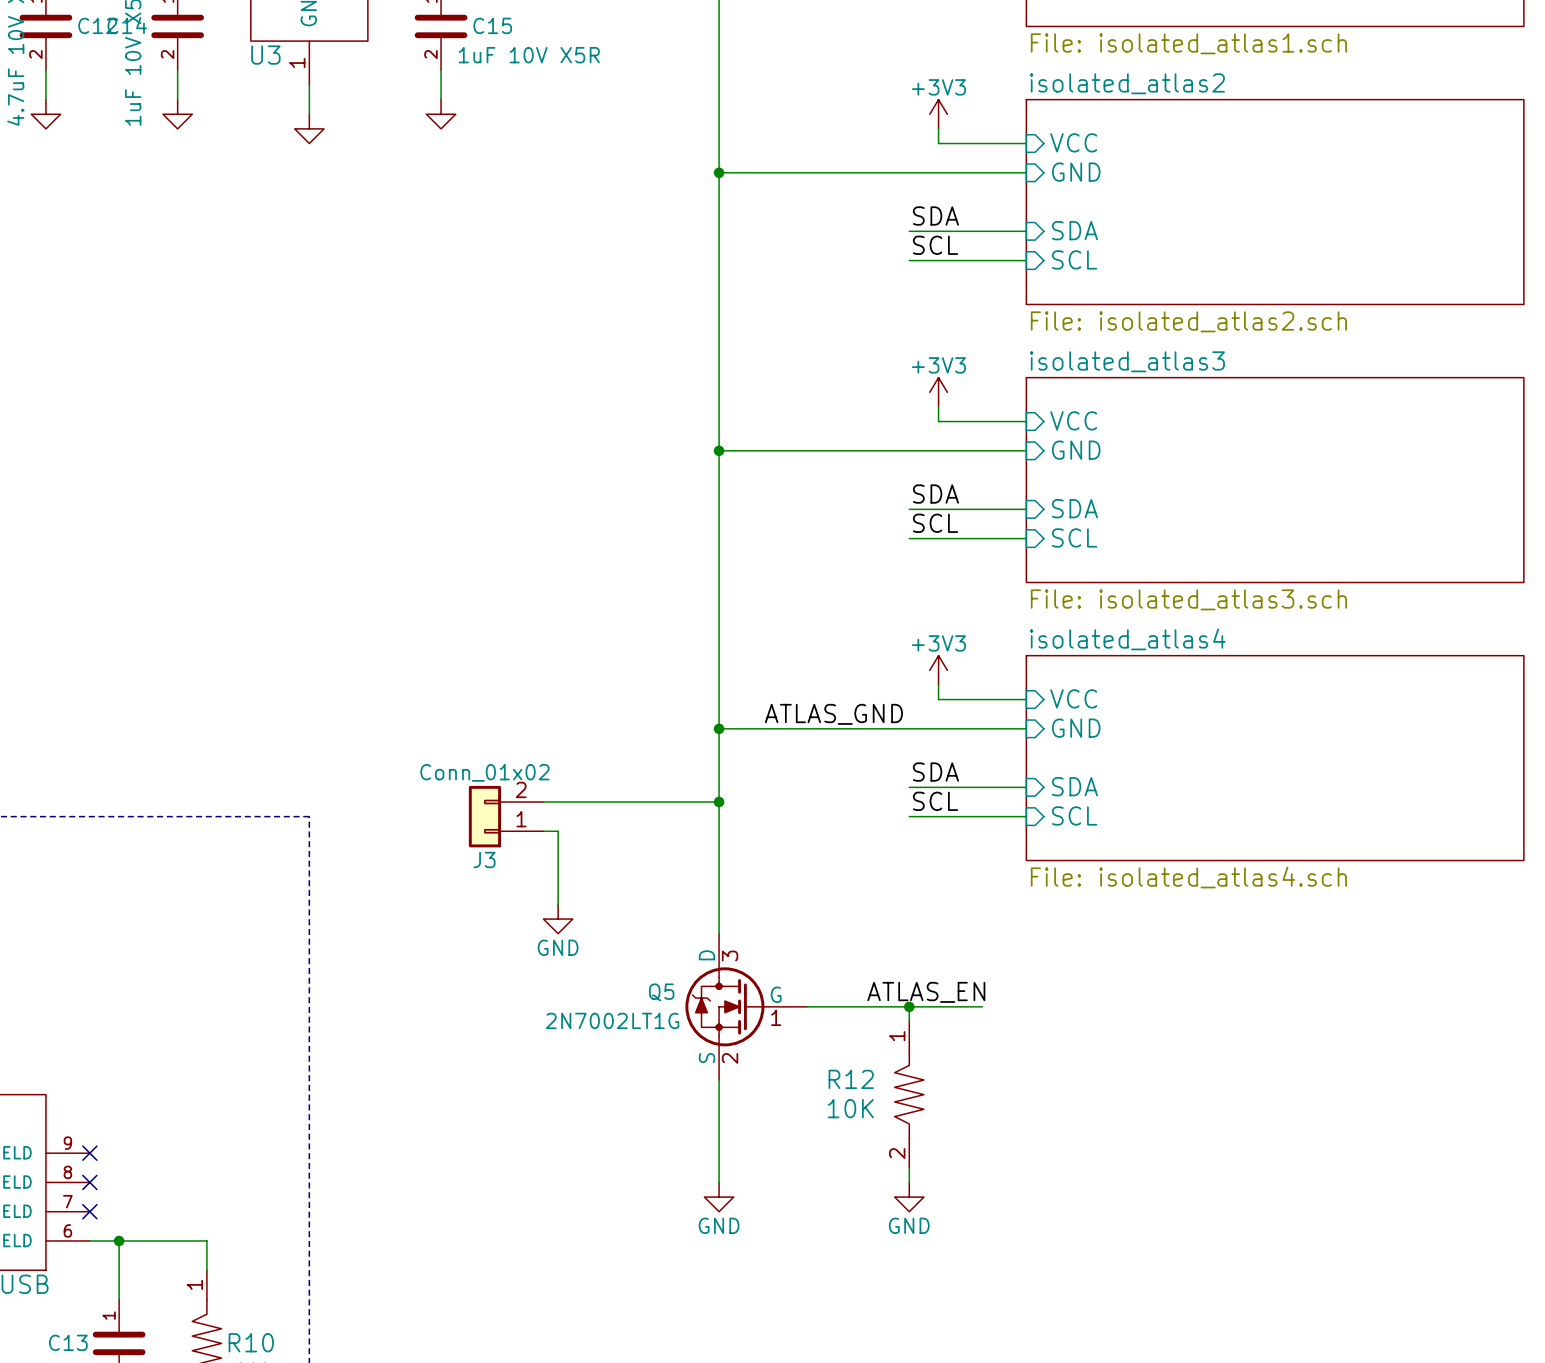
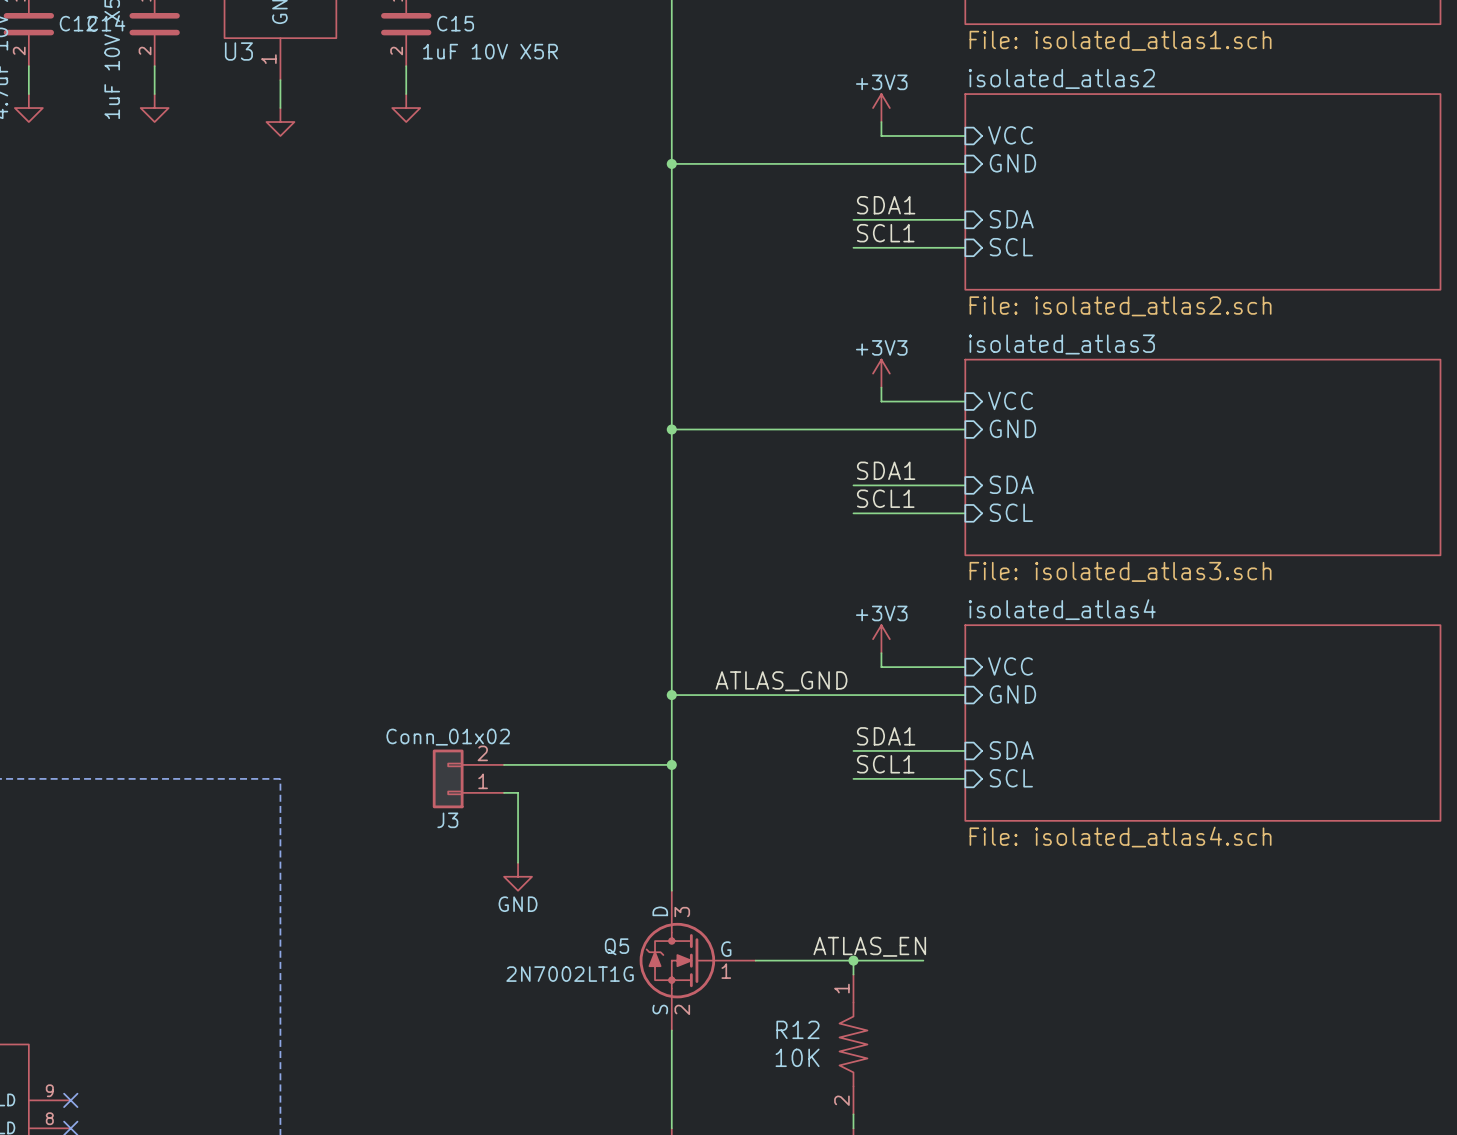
label: SDA (935, 216) -> SDA1 (886, 205)
label: SCL (935, 245) -> SCL1 (885, 233)
label: SDA (935, 494) -> SDA1 (886, 470)
label: SCL (935, 523) -> SCL1 (885, 498)
label: SDA (935, 772) -> SDA1 (886, 736)
label: SCL (935, 801) -> SCL1 (885, 764)

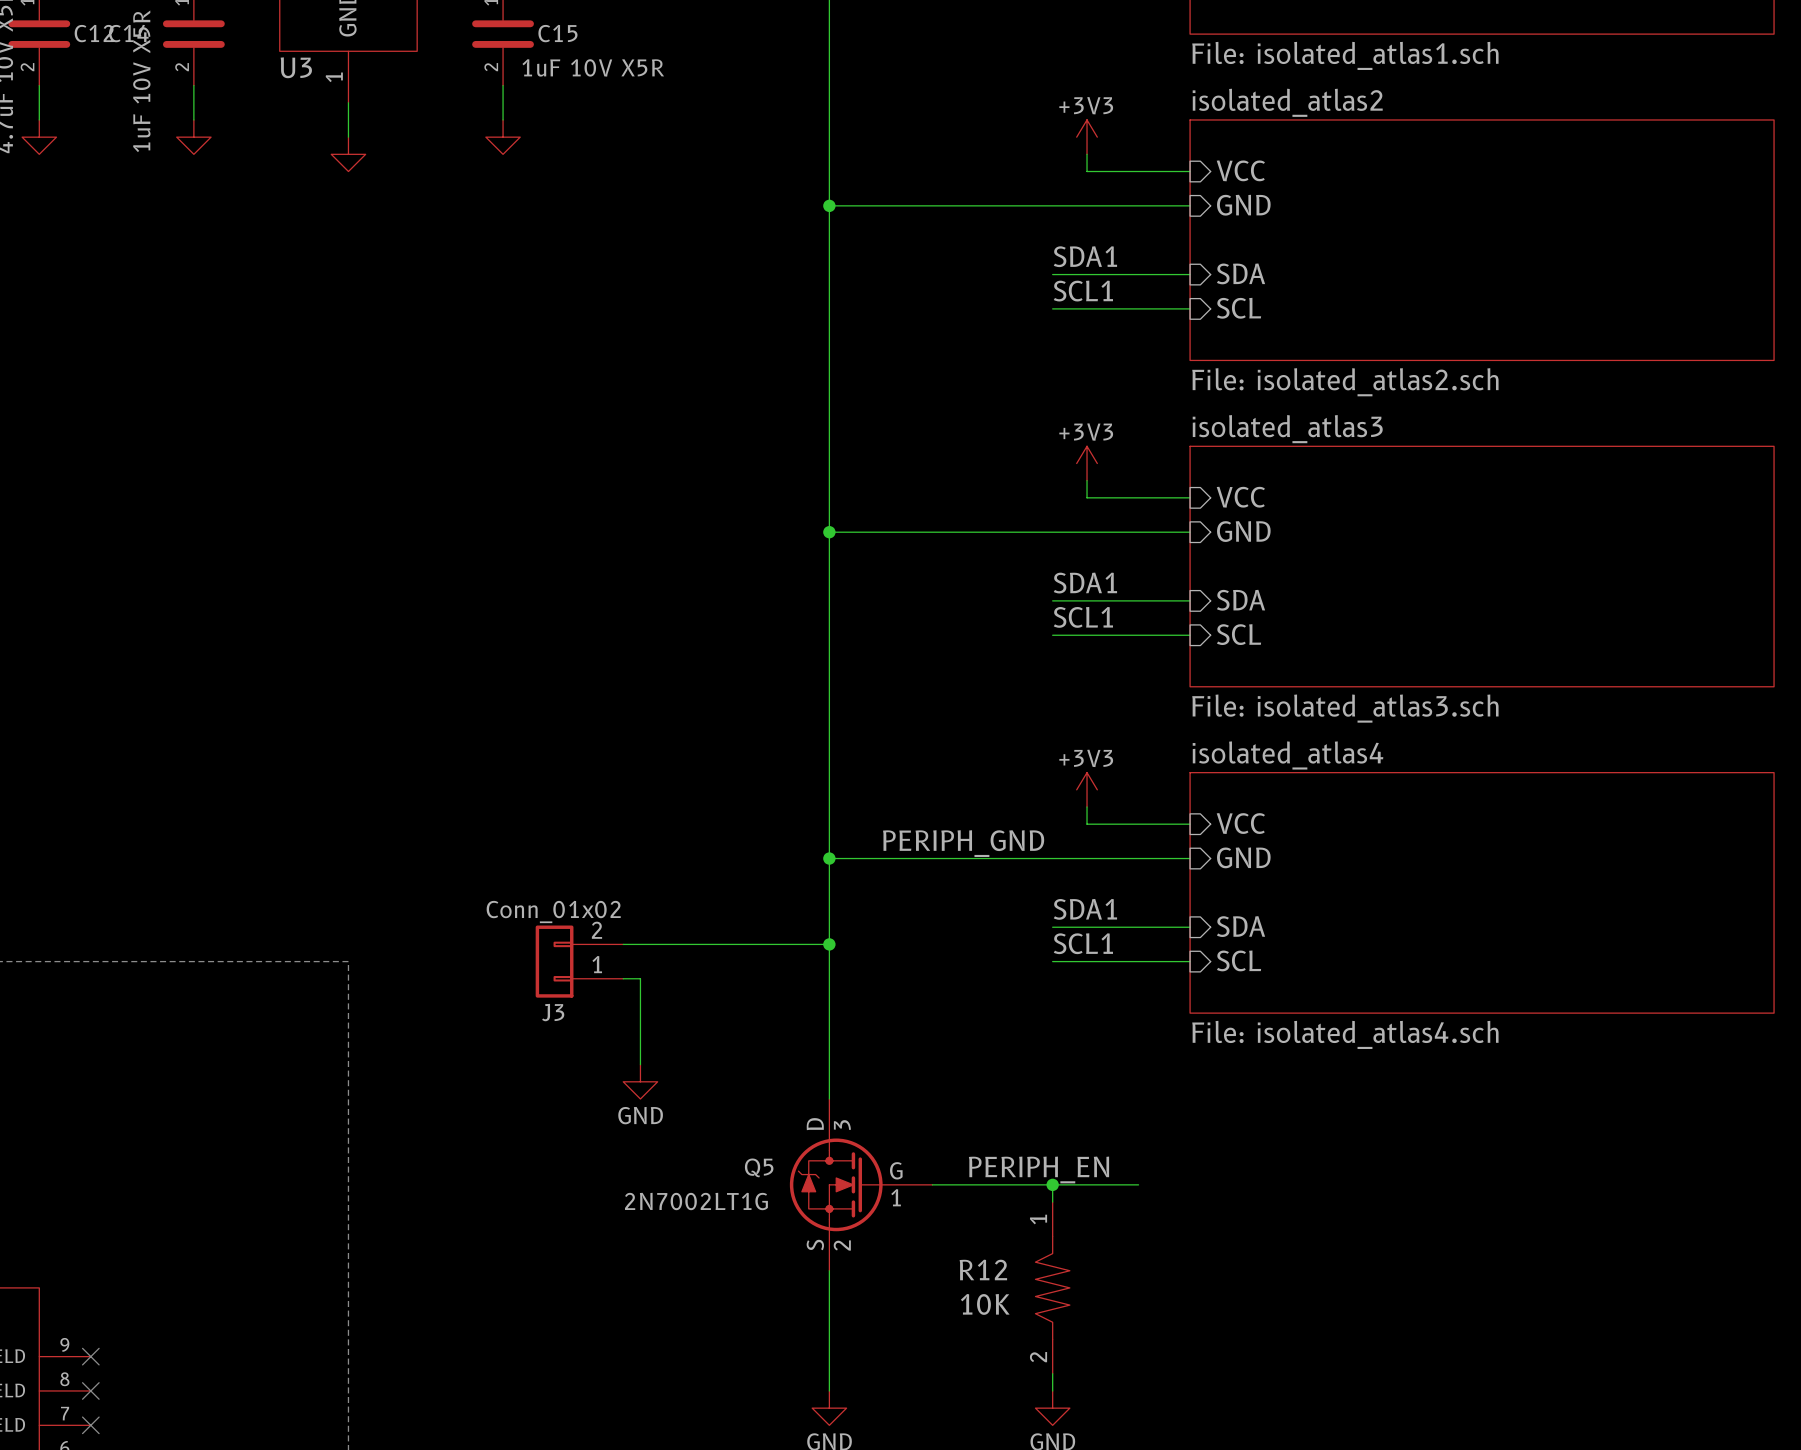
label: ATLAS_GND (781, 681) -> PERIPH_GND (963, 843)
label: none -> PERIPH_EN (1038, 1169)
label: ATLAS_EN (869, 946) -> none

